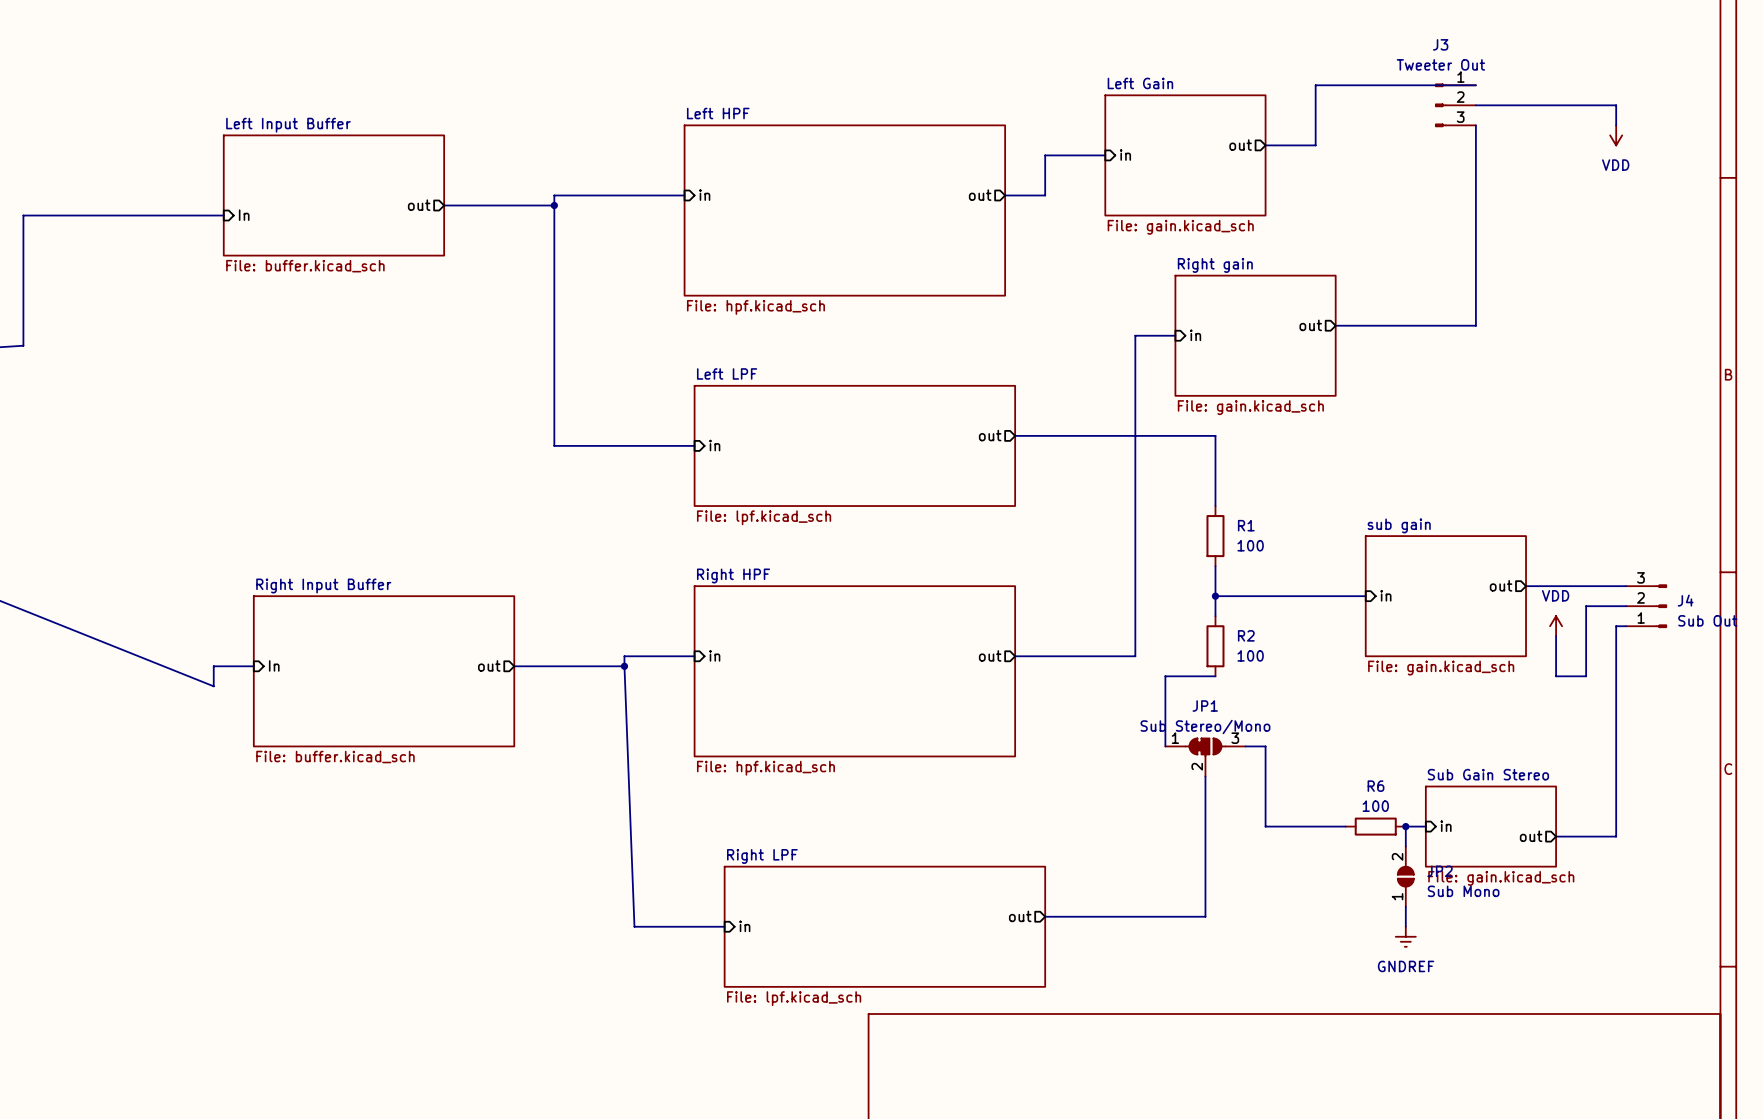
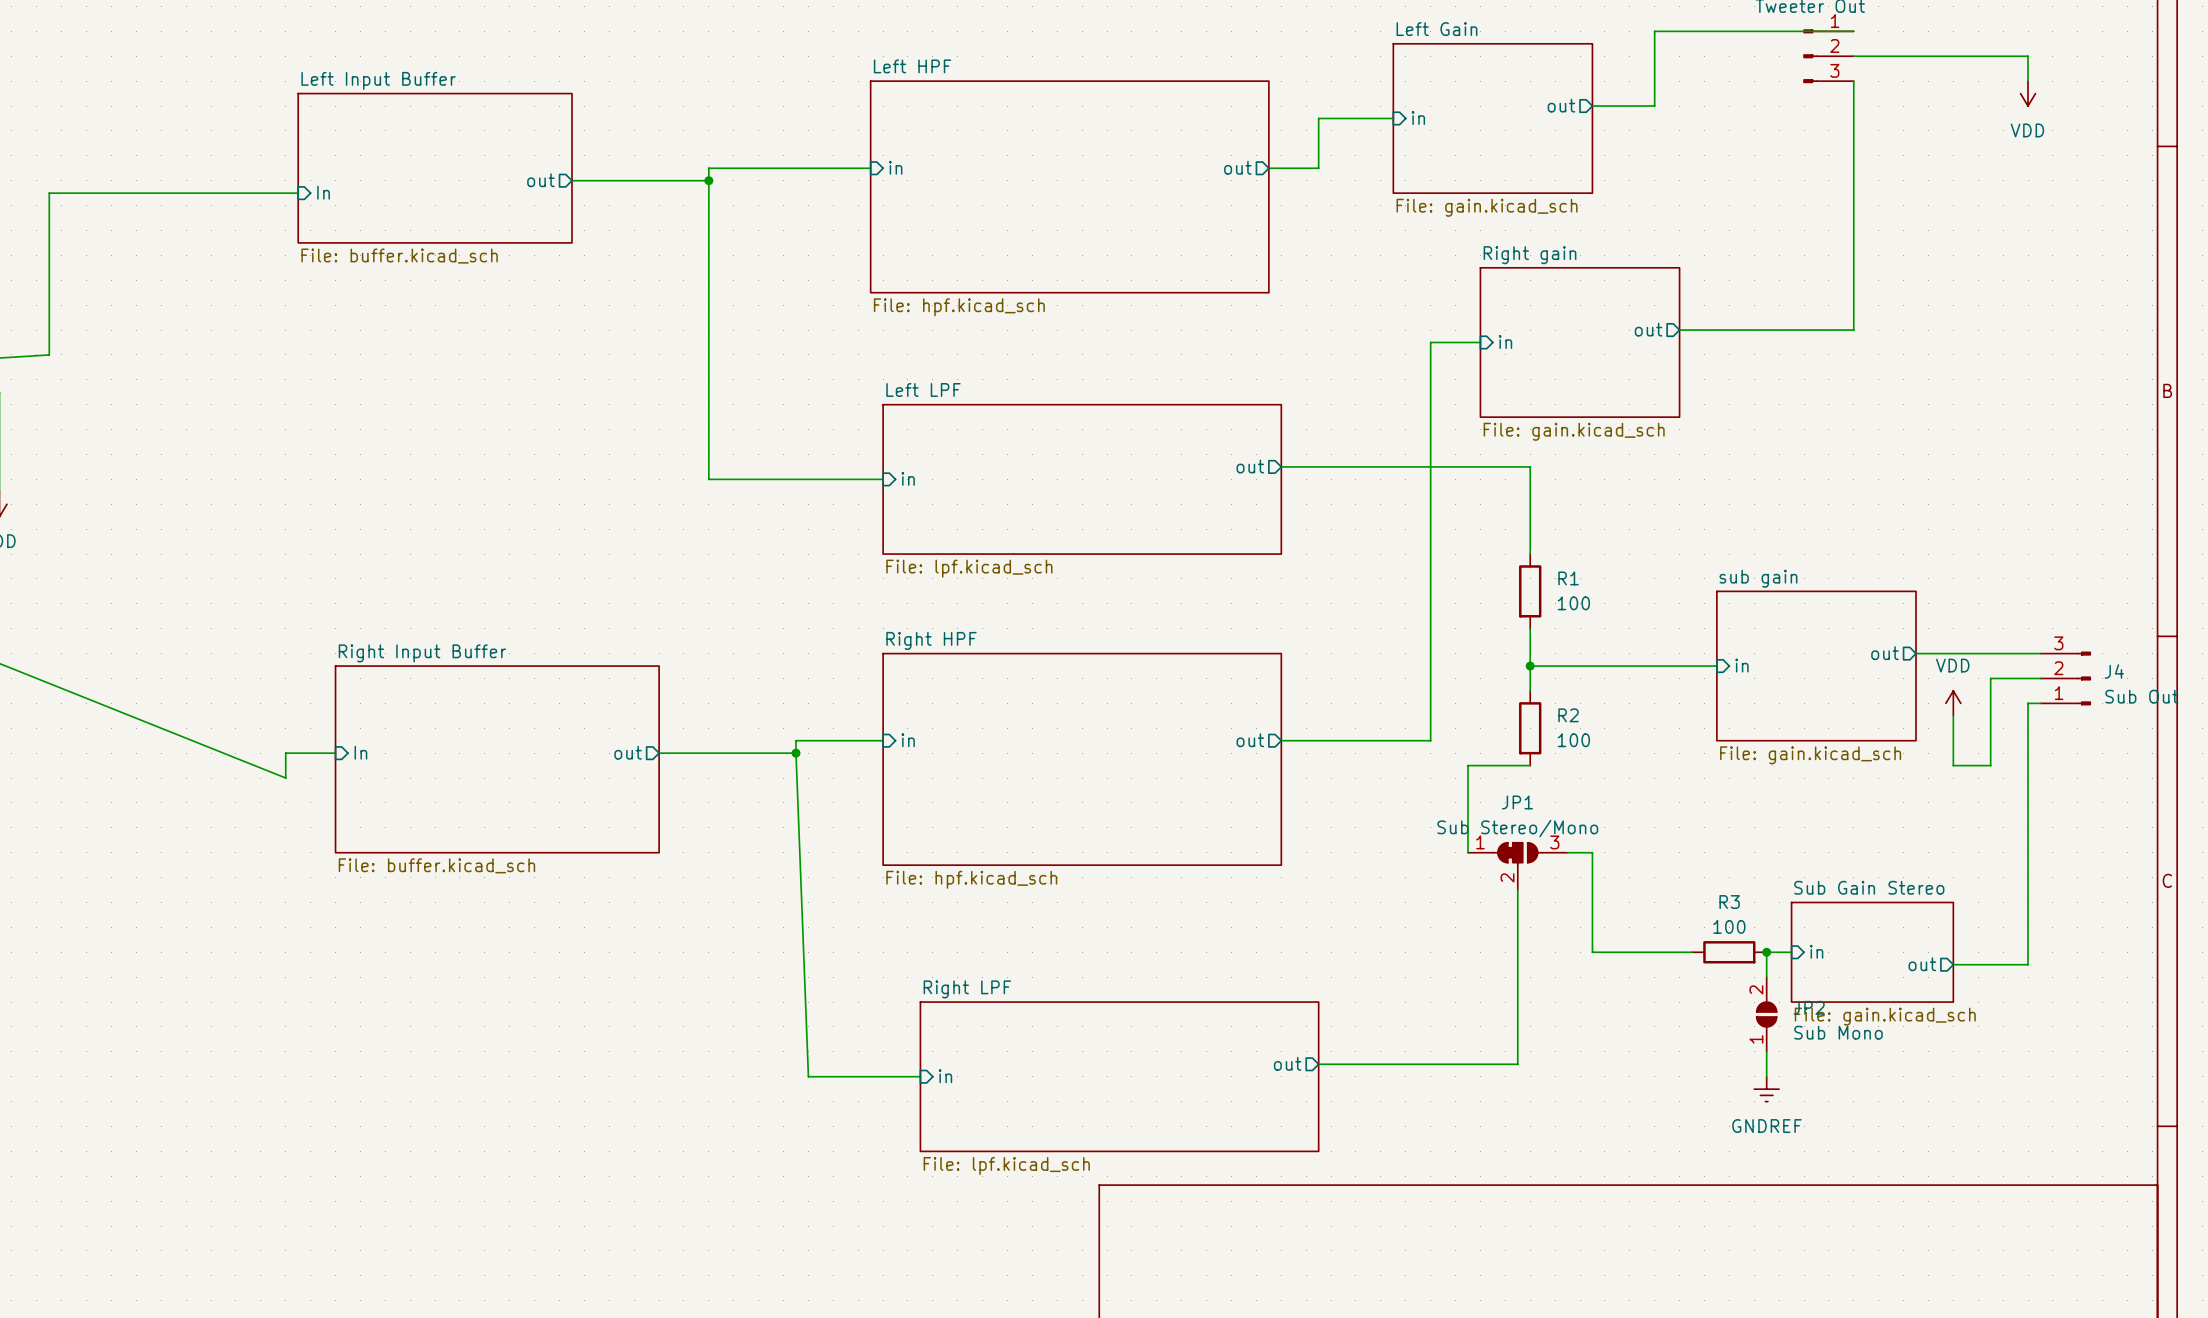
R6 name: R6 (1376, 786) -> R3 (1729, 902)

